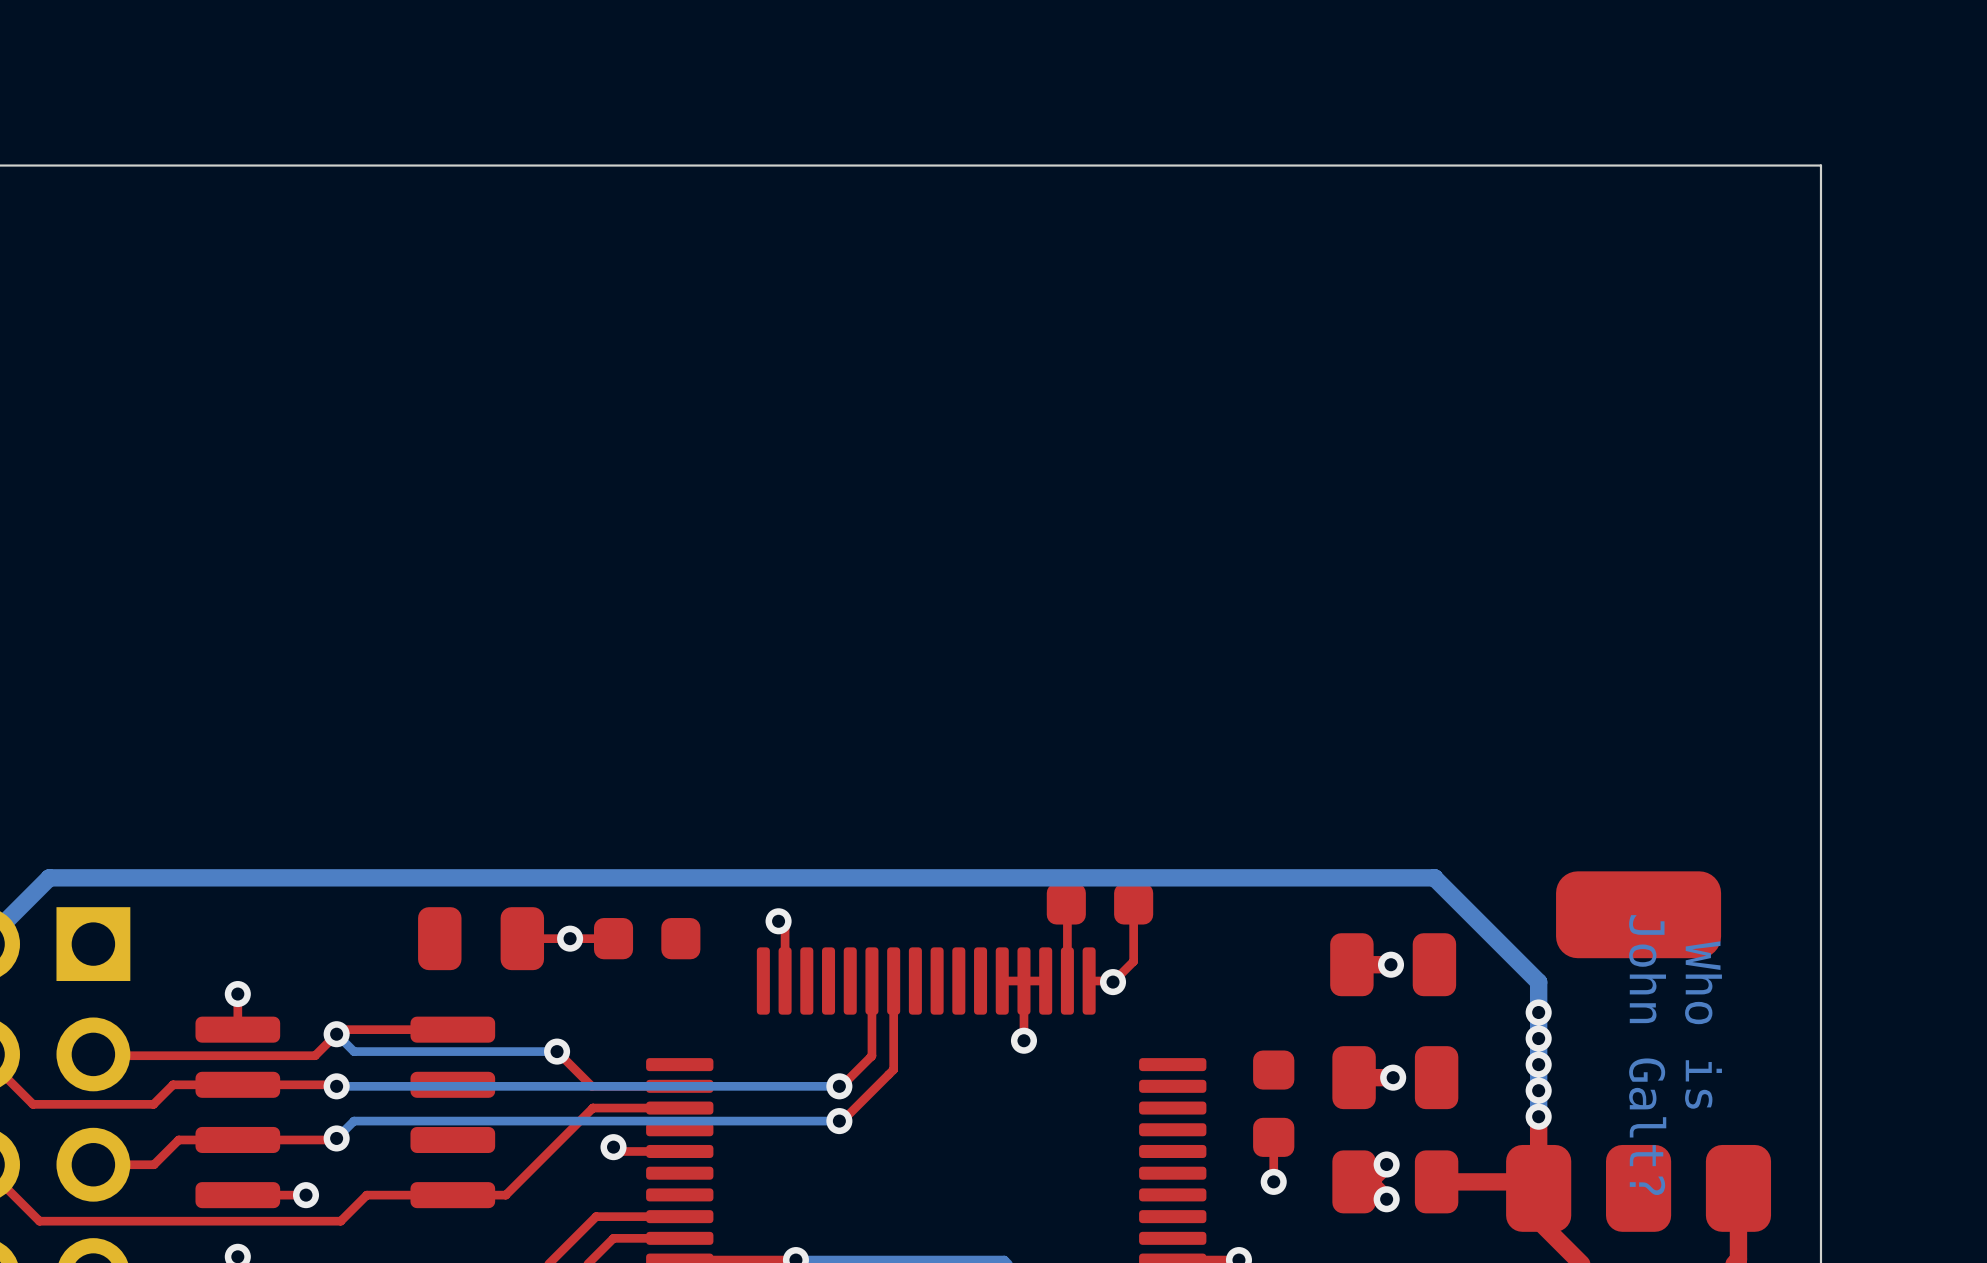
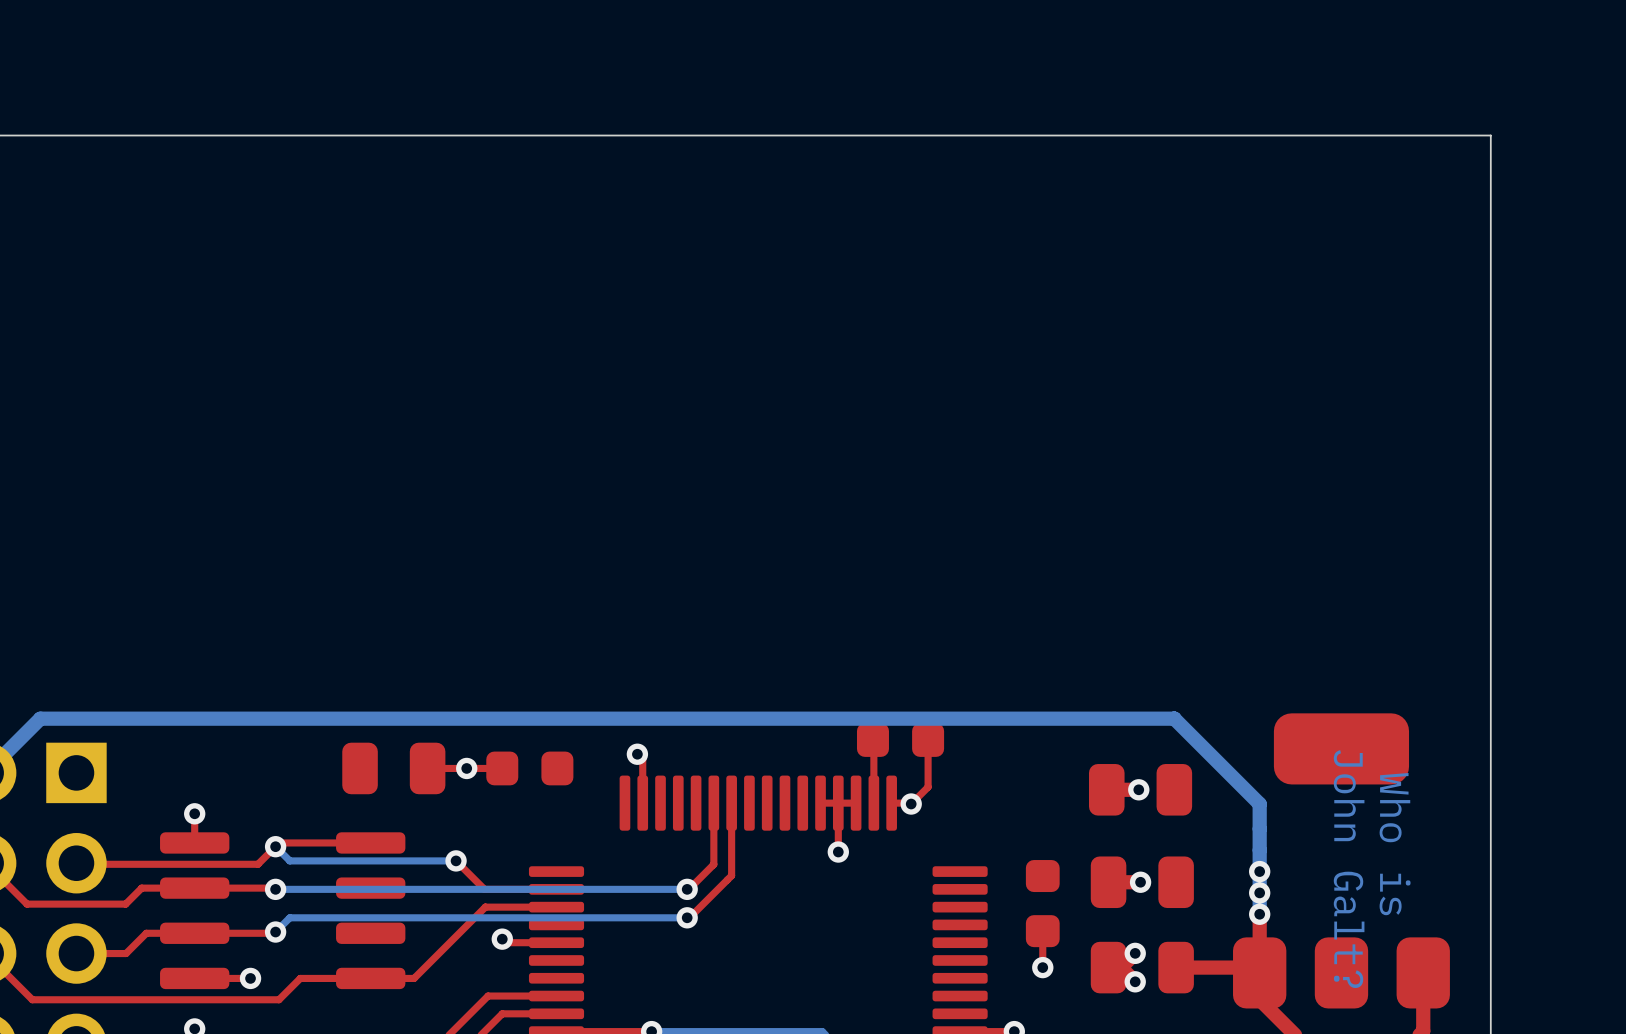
via: (1538, 1012) -> none
via: (1538, 1038) -> none

